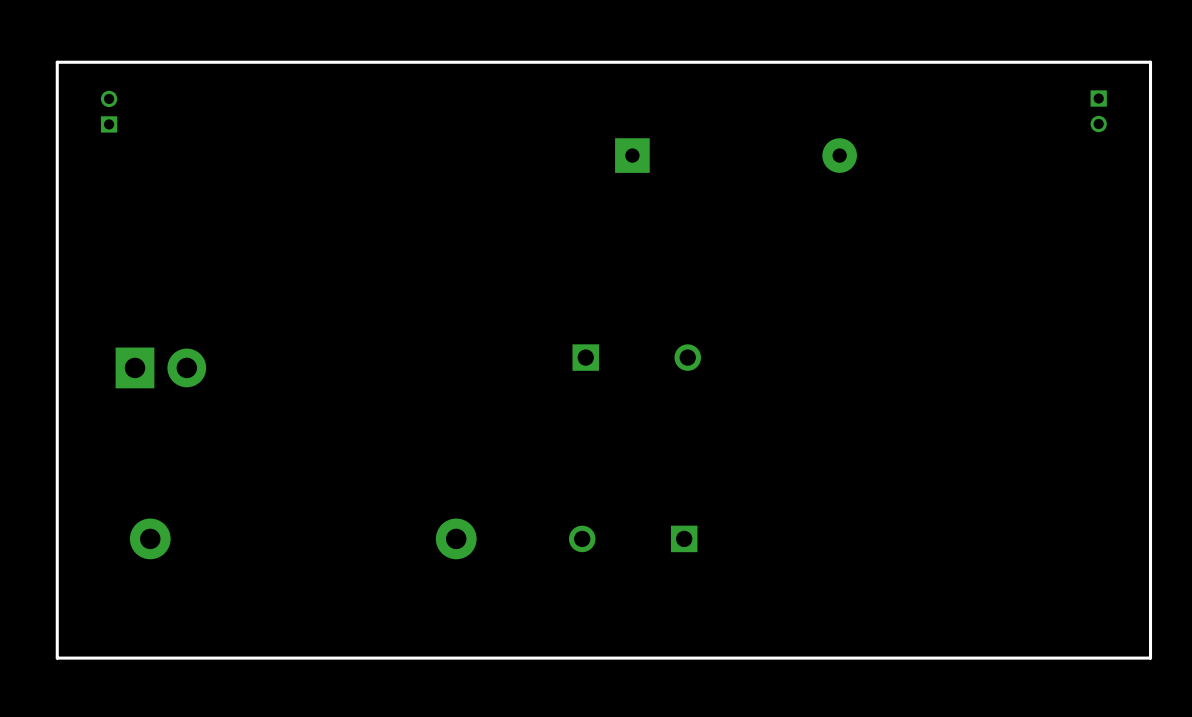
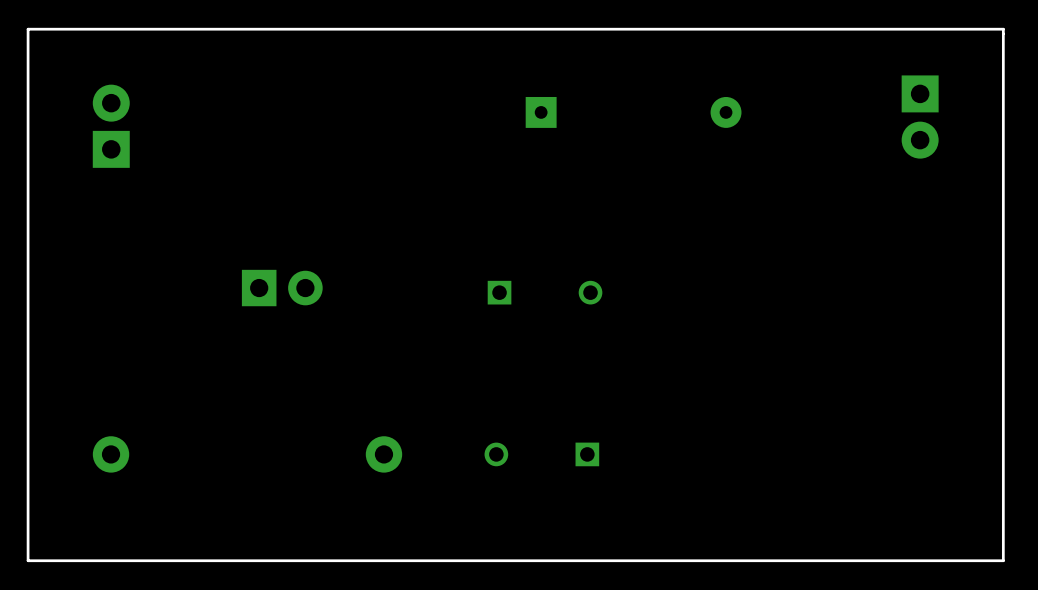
part: (109, 111) -> none
part: (1098, 111) -> none
part: none -> (920, 117)
part: none -> (111, 126)
part position: (160, 367) -> (282, 288)

